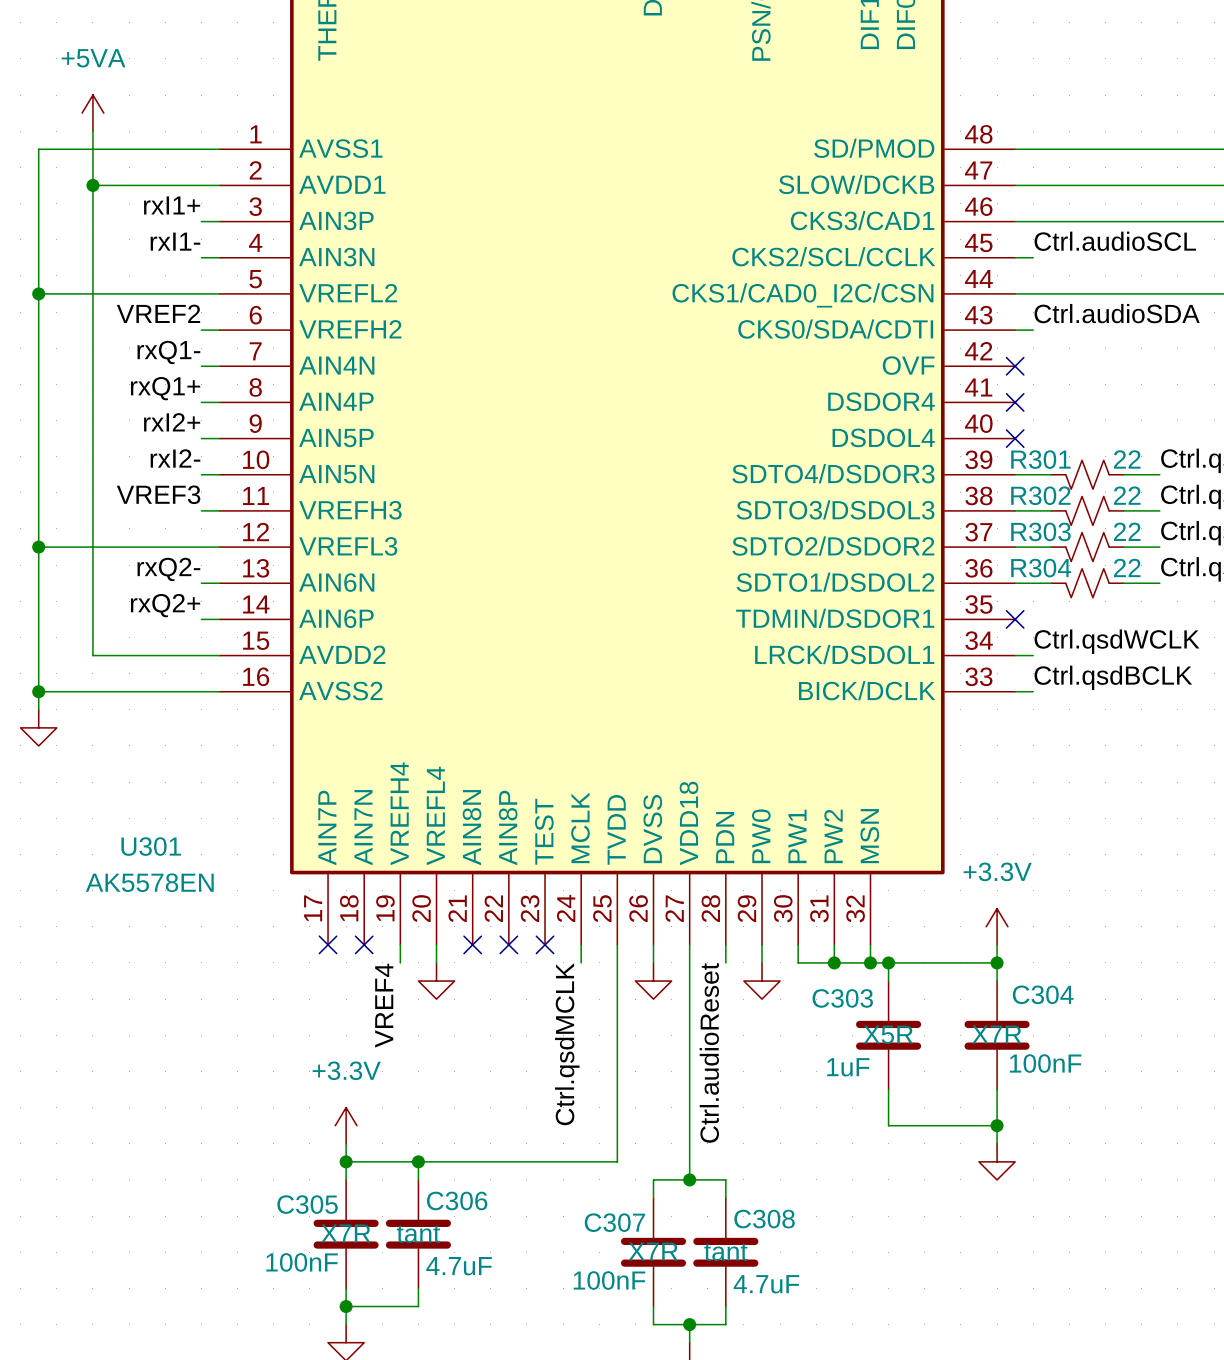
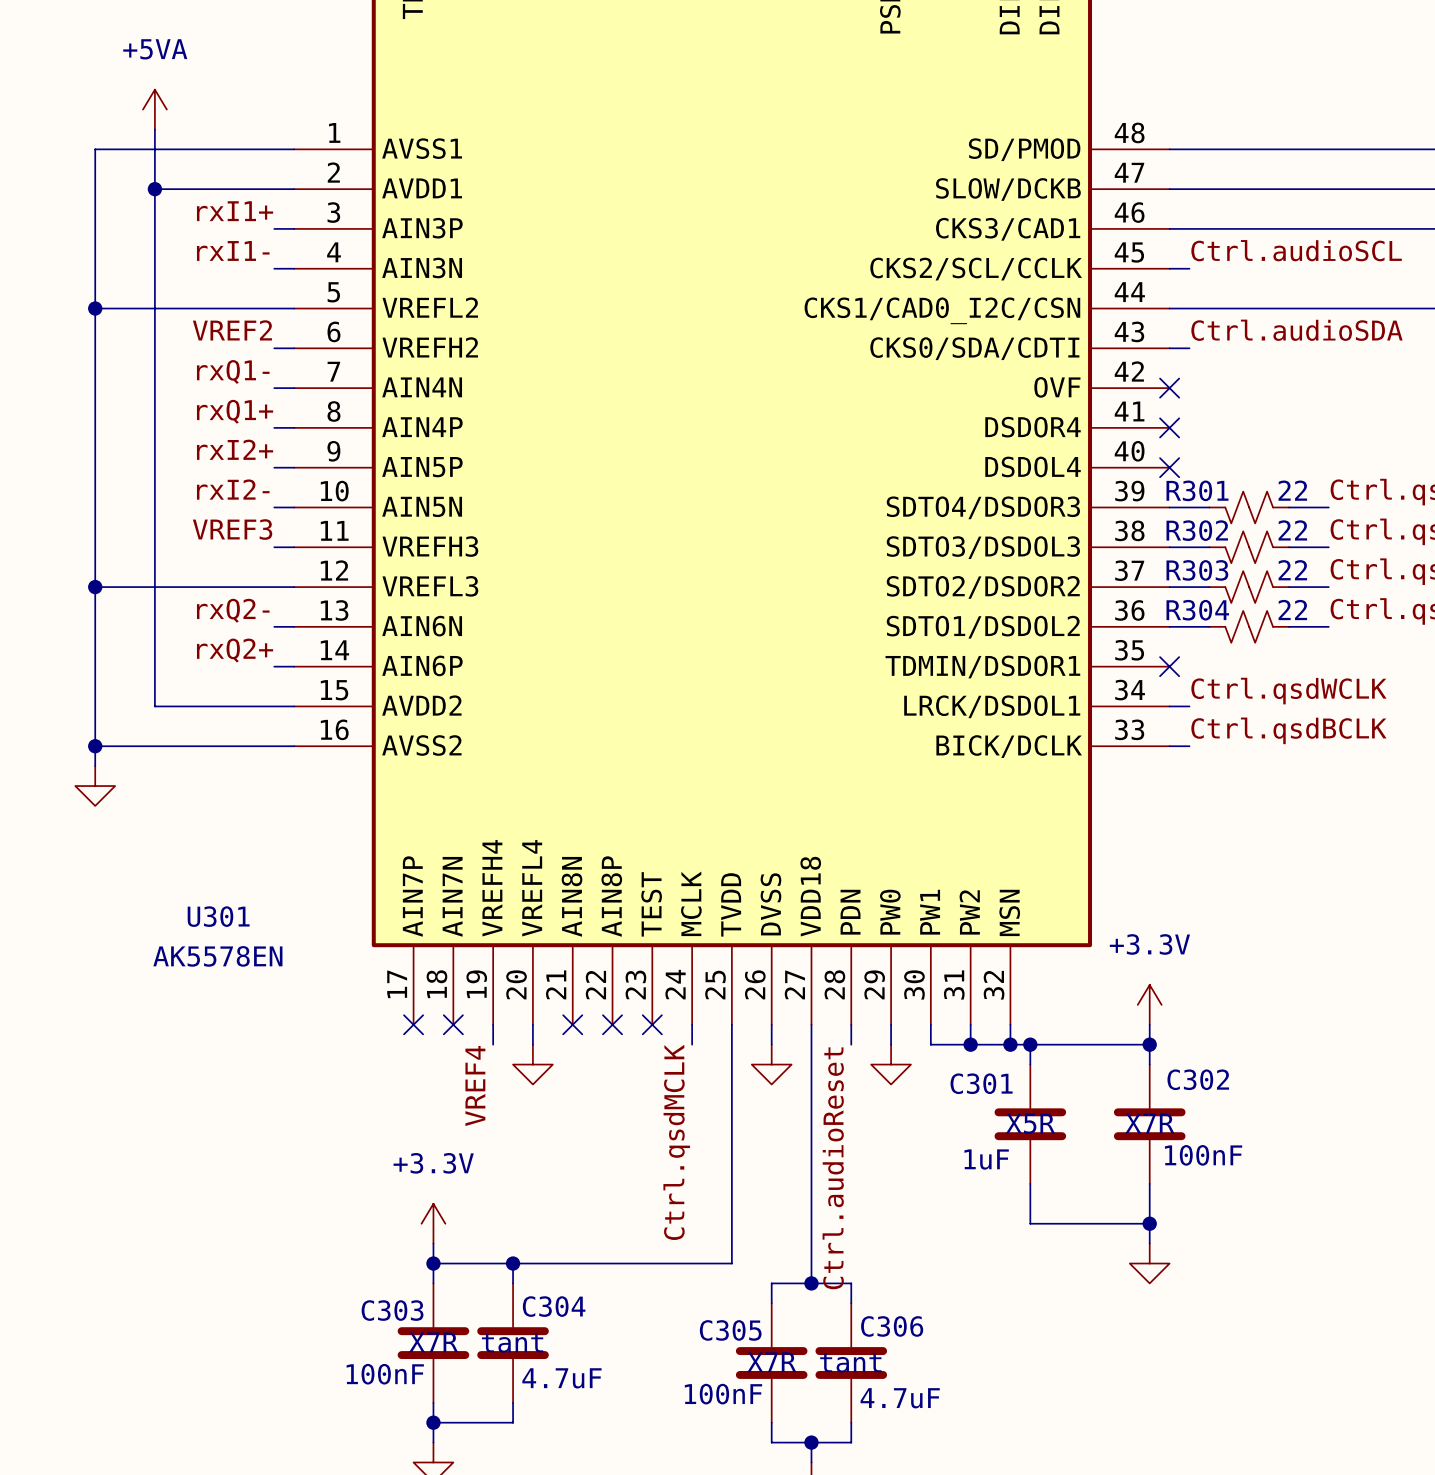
C304 name: C304 (1043, 994) -> C302 (1198, 1079)
C303 name: C303 (842, 998) -> C301 (981, 1083)
C306 name: C306 (457, 1200) -> C304 (554, 1306)
C305 name: C305 (307, 1204) -> C303 (392, 1310)
C308 name: C308 (764, 1219) -> C306 (892, 1326)
C307 name: C307 (614, 1222) -> C305 (730, 1330)

